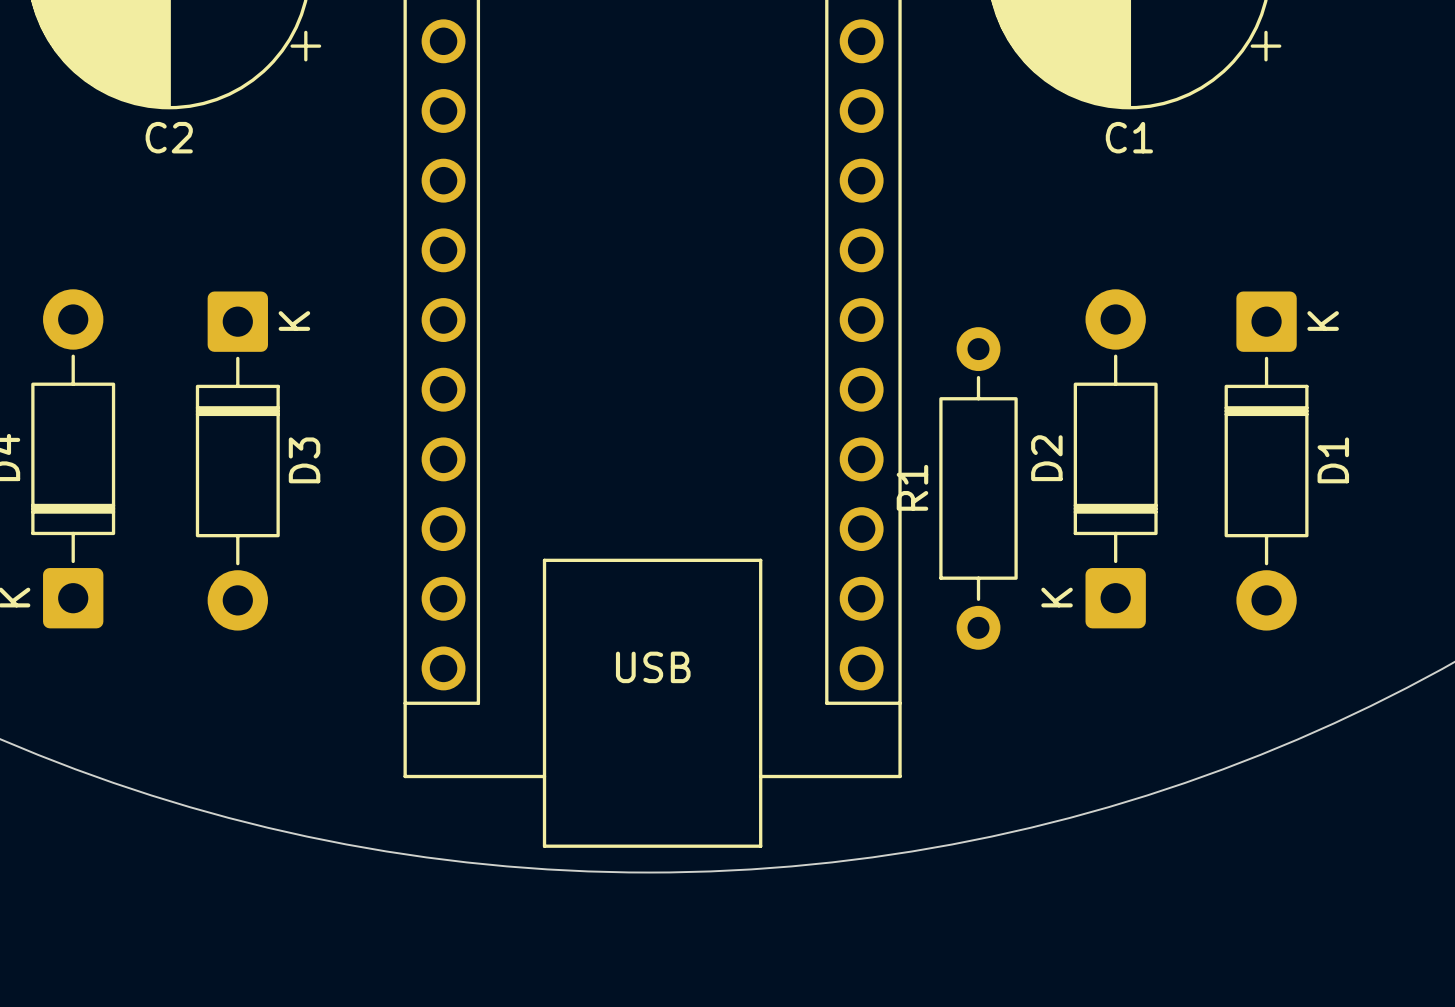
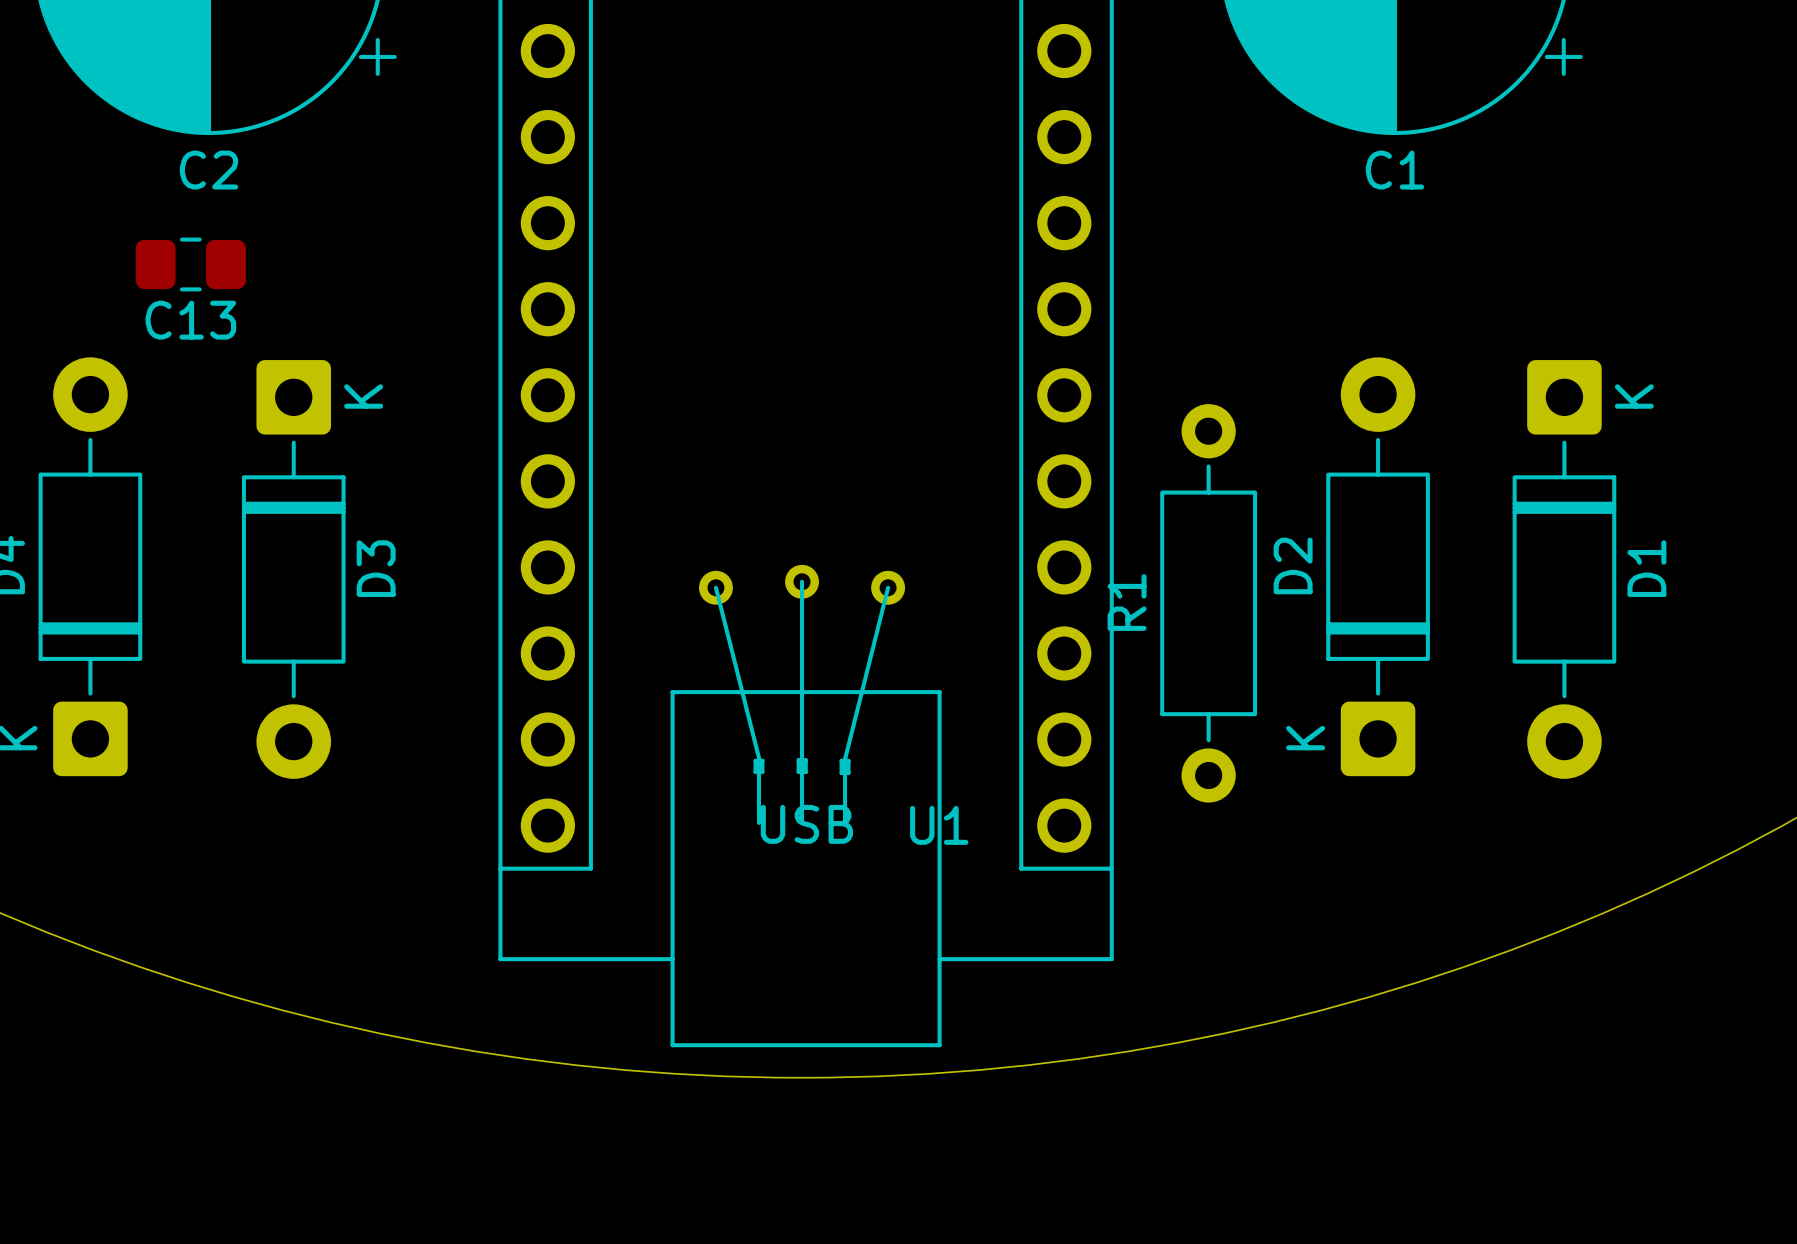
C13: none -> (190, 264)
U1: none -> (802, 694)

